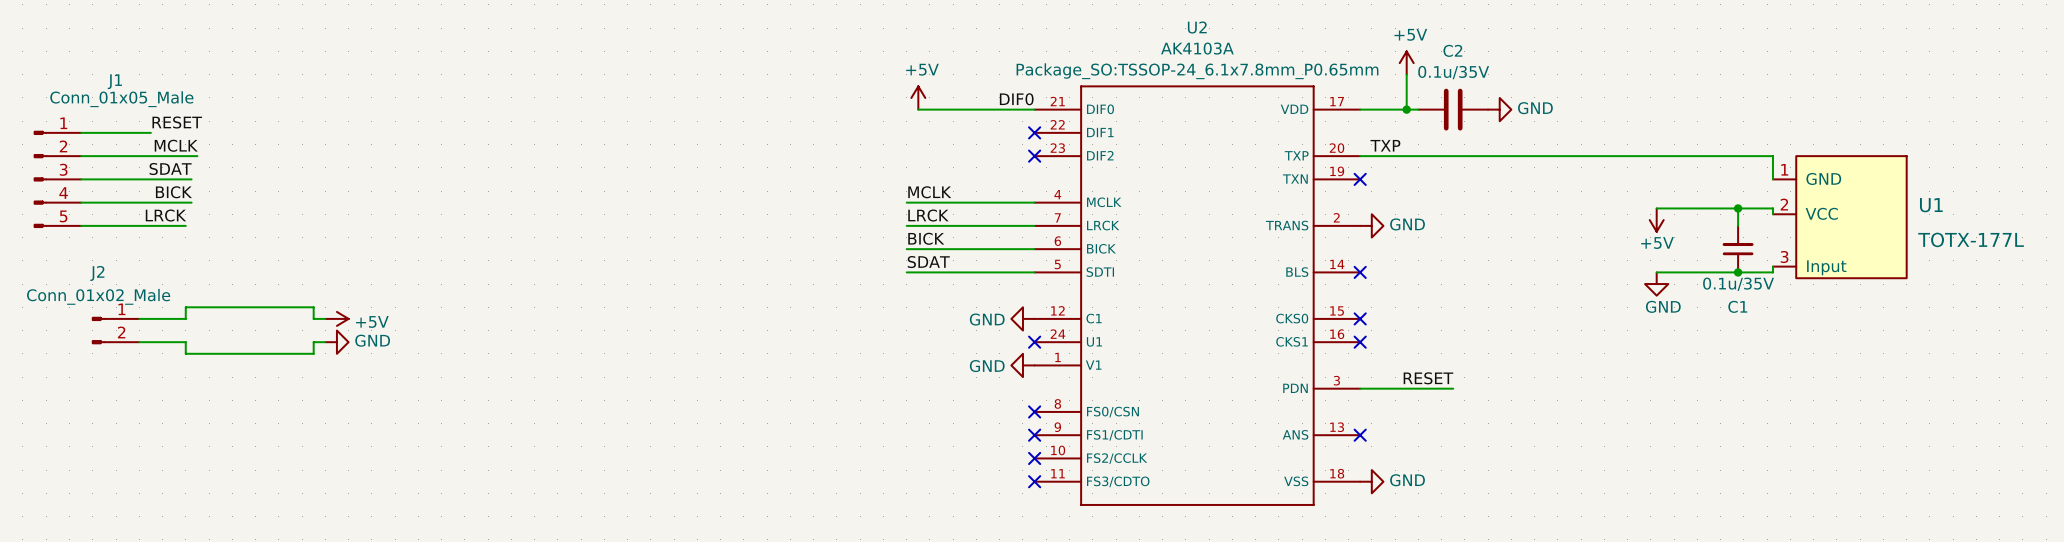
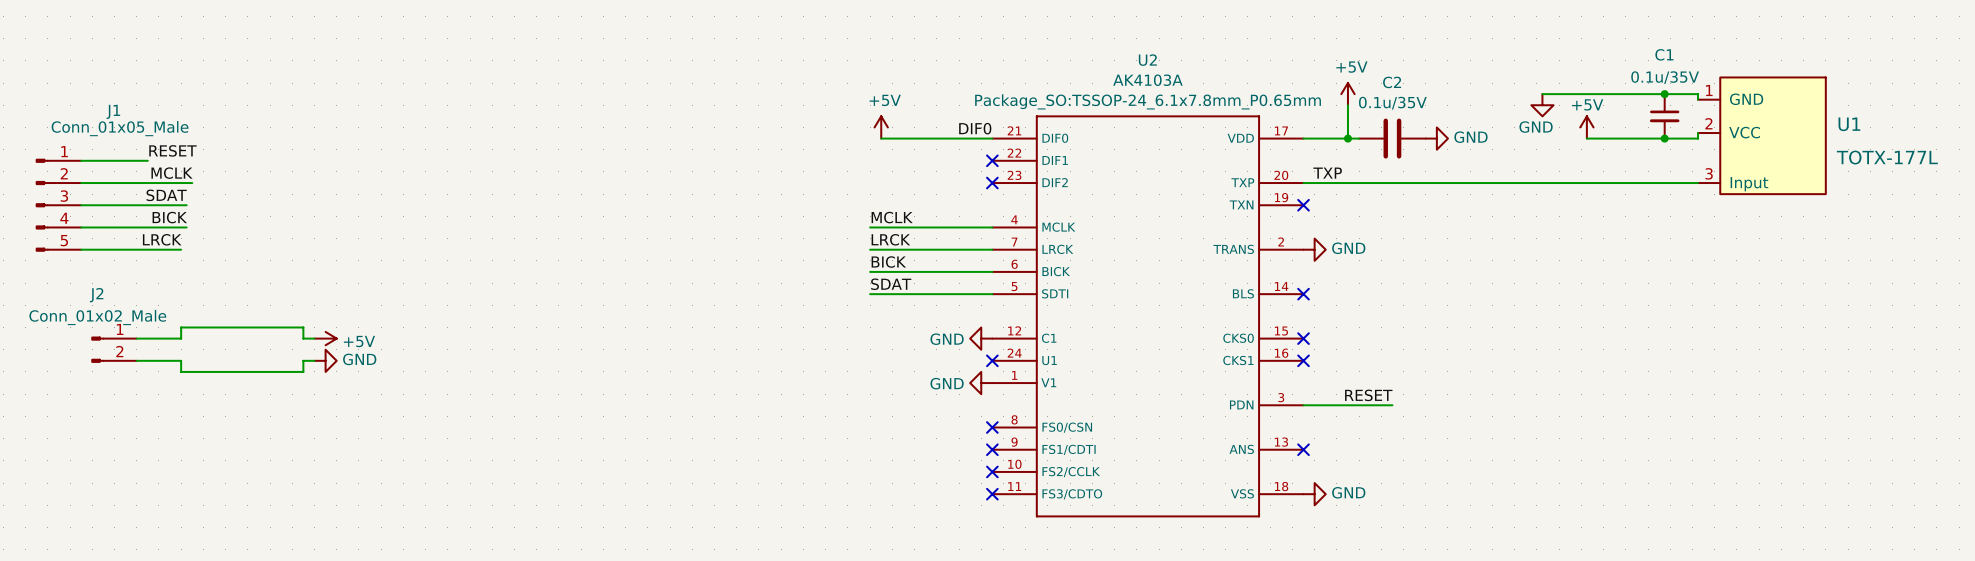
wire: none -> (1542, 94) (1698, 94) (1698, 99)
junction: none -> (1664, 94)
junction: none -> (1664, 138)
wire: (1772, 156) (1772, 179) -> none
wire: (1656, 208) (1772, 208) (1772, 214) -> none
wire: (1738, 208) (1738, 225) -> none
junction: (1738, 208) -> none
U1 position: (1839, 217) -> (1761, 135)
power symbol rotation: 0° (1656, 220) -> 180° (1586, 127)
power symbol position: +5V (1656, 220) -> +5V (1586, 127)
C1 rotation: 0° (1738, 249) -> 180° (1664, 116)
C1 position: (1738, 249) -> (1664, 116)
wire: (1772, 266) (1772, 272) (1656, 272) -> (1698, 133) (1698, 138) (1586, 138)
junction: (1738, 272) -> none
power symbol position: GND (1656, 284) -> GND (1542, 105)
power symbol text position: GND (1663, 306) -> GND (1536, 127)

